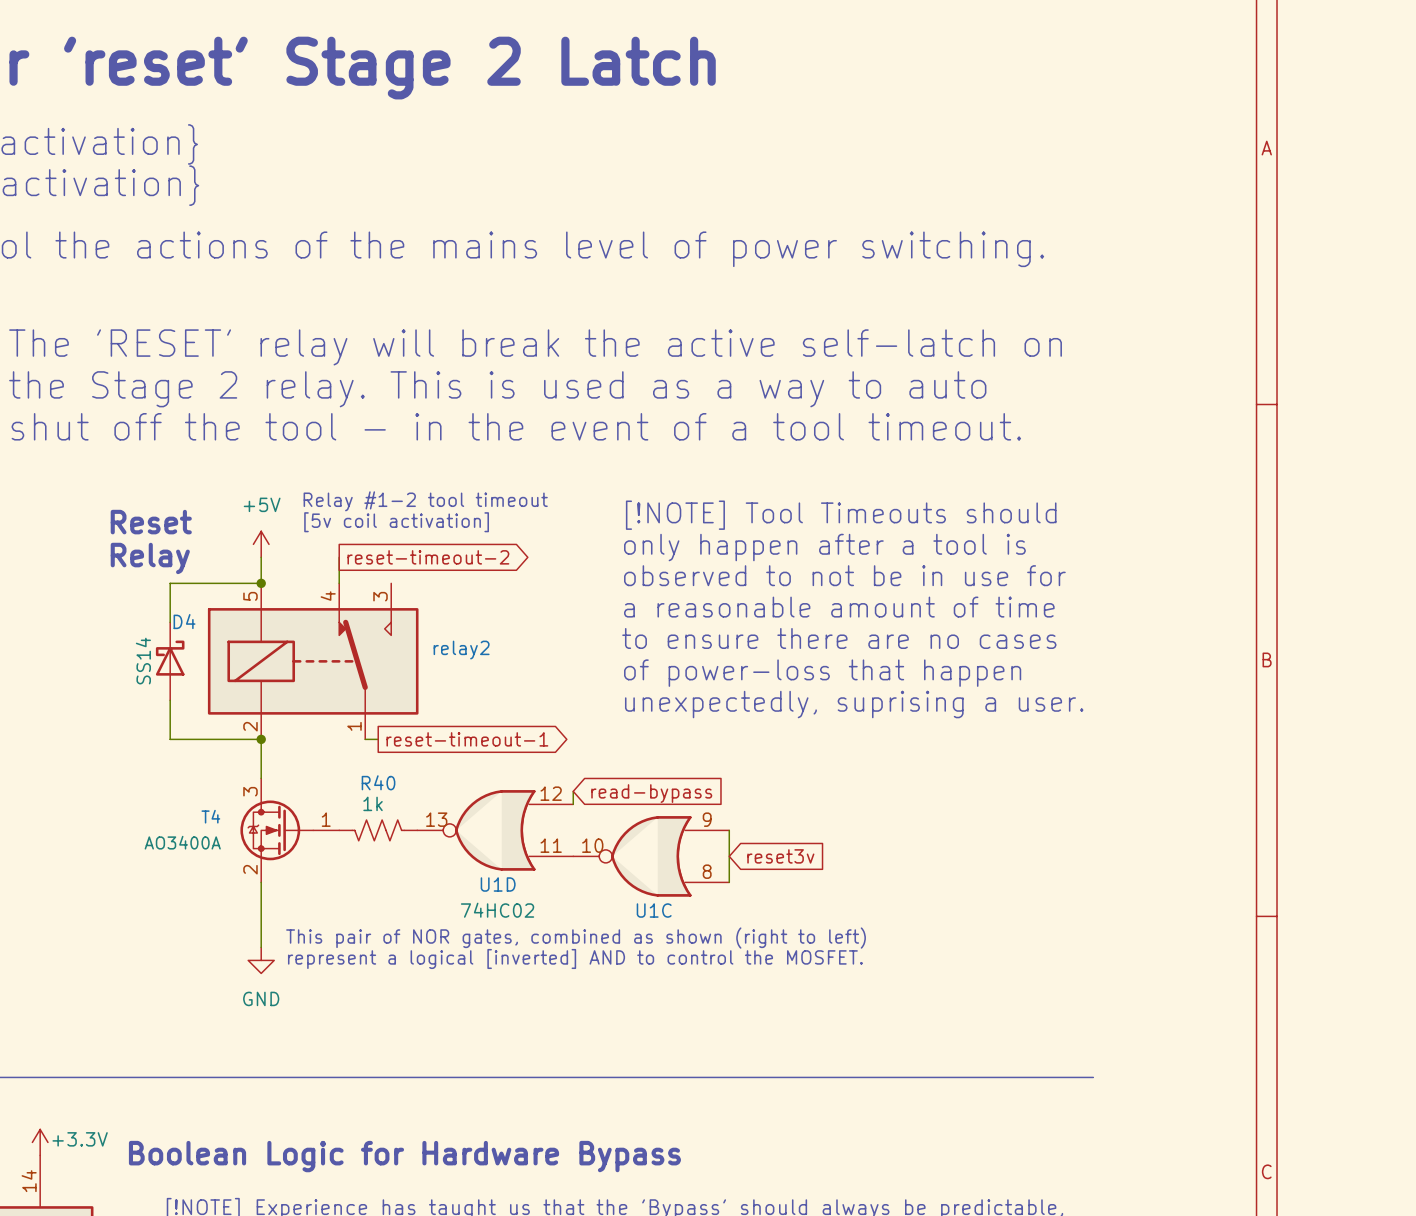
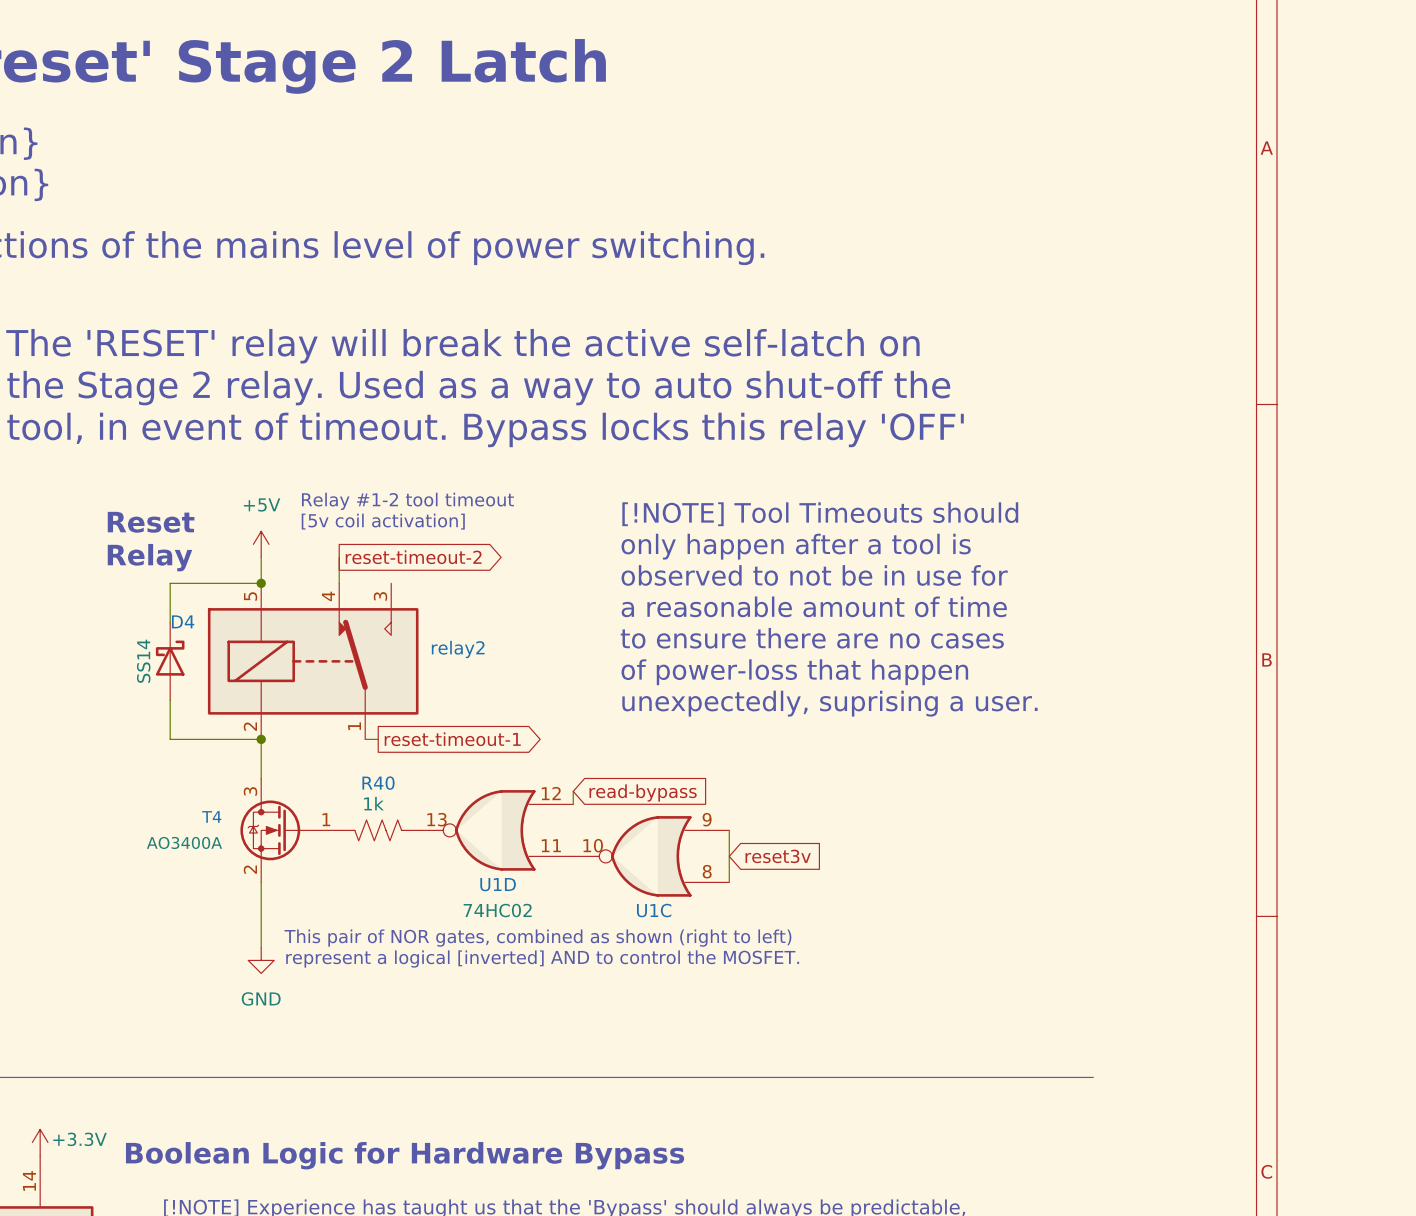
text: the Stage 2 relay. This is used as a way to auto (497, 389) -> the Stage 2 relay. Used as a way to auto shut-off the (478, 388)
text: shut off the tool - in the event of a tool timeout. (516, 426) -> tool, in event of timeout. Bypass locks this relay 'OFF' (485, 429)

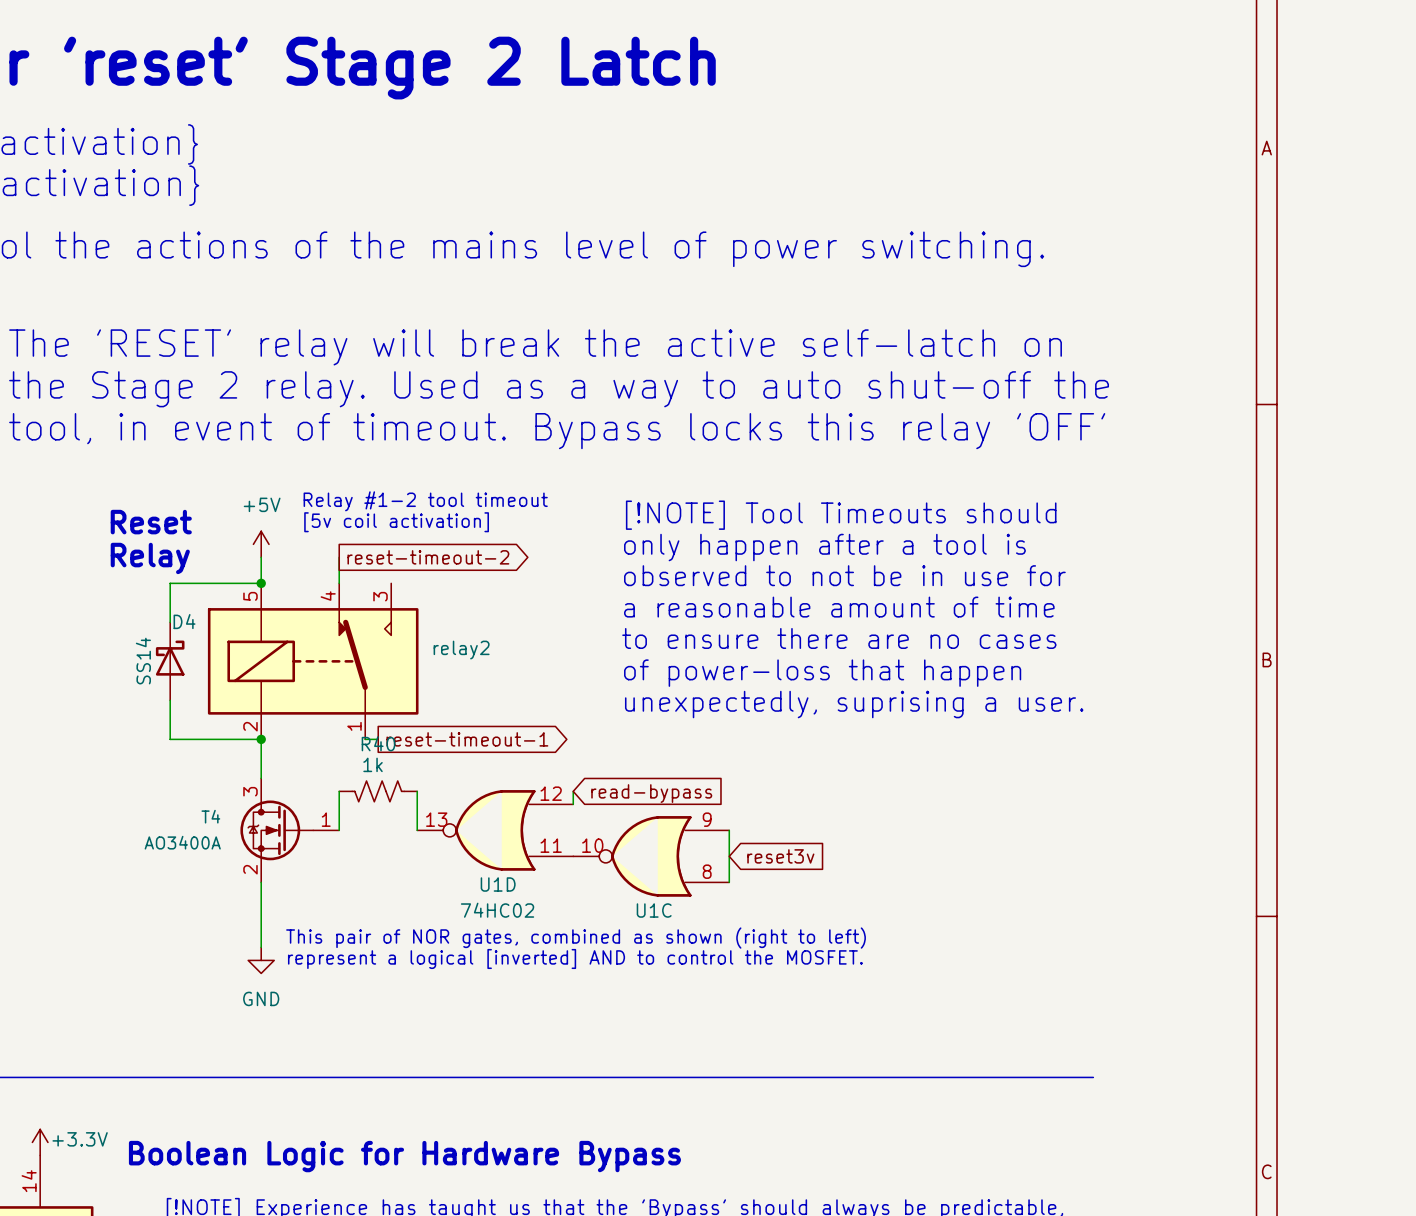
wire: none -> (339, 791) (339, 830)
wire: none -> (417, 791) (417, 830)
R40 position: (378, 830) -> (378, 791)

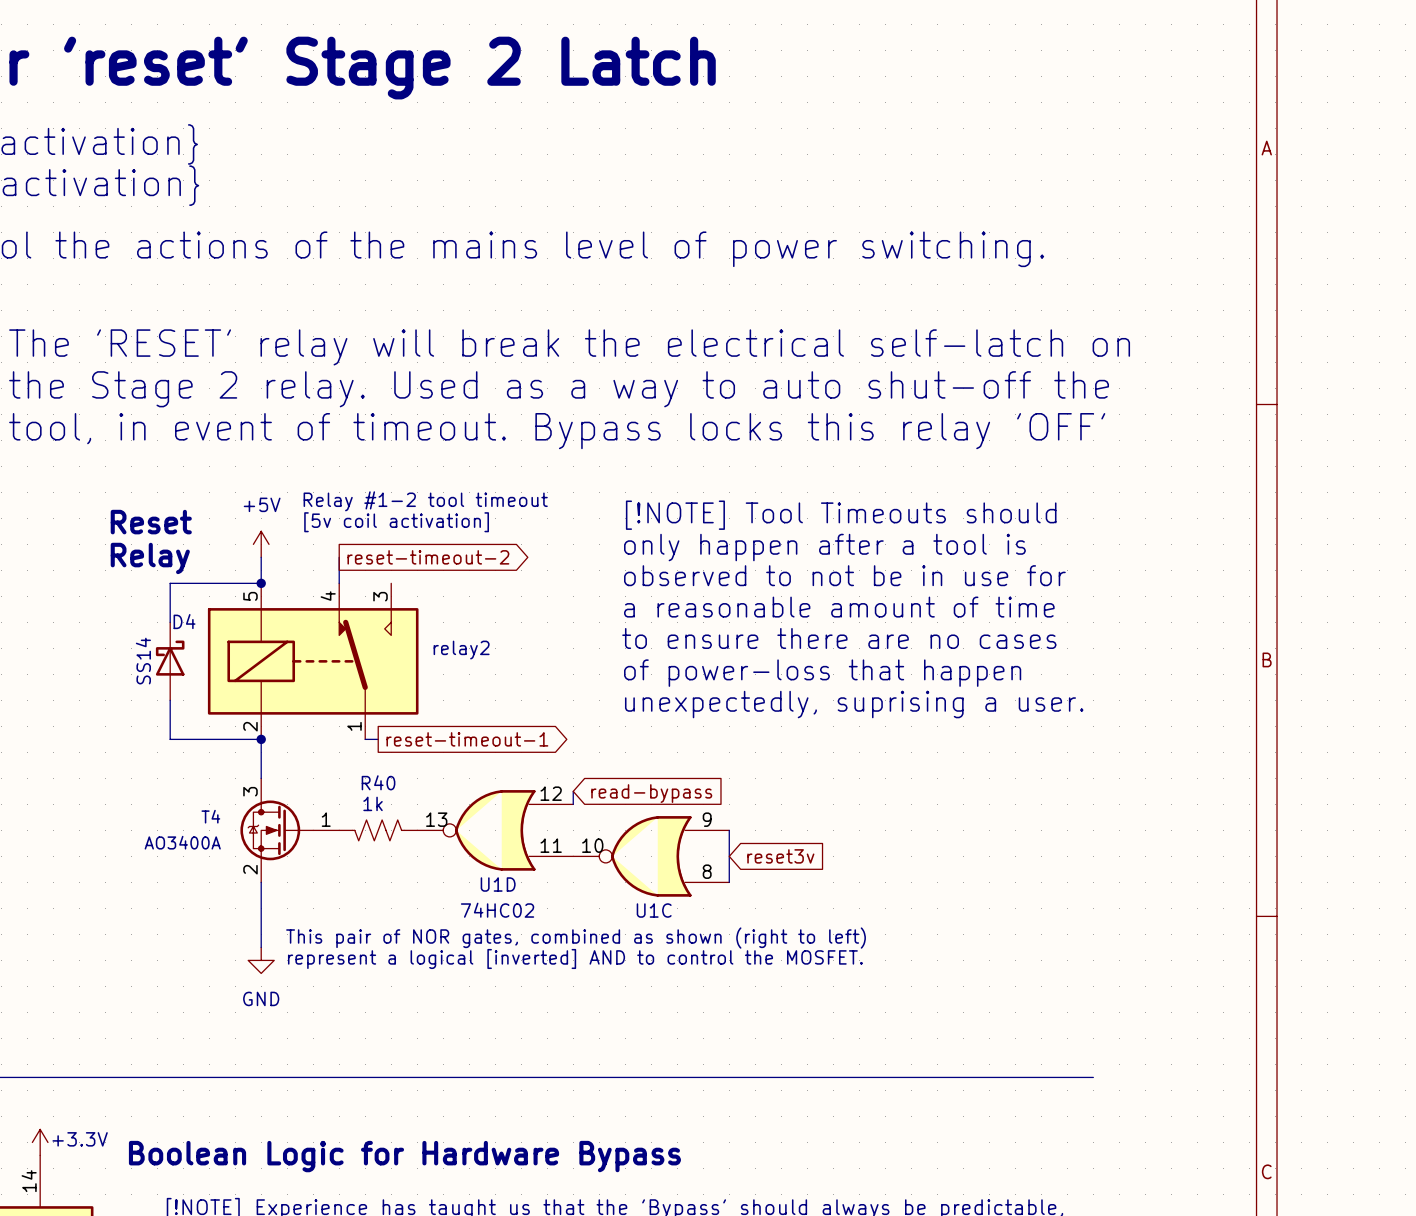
text: The 'RESET' relay will break the active self-latch on (535, 347) -> The 'RESET' relay will break the electrical self-latch on (569, 347)
wire: (339, 791) (339, 830) -> none
R40 position: (378, 791) -> (378, 830)
wire: (417, 791) (417, 830) -> none

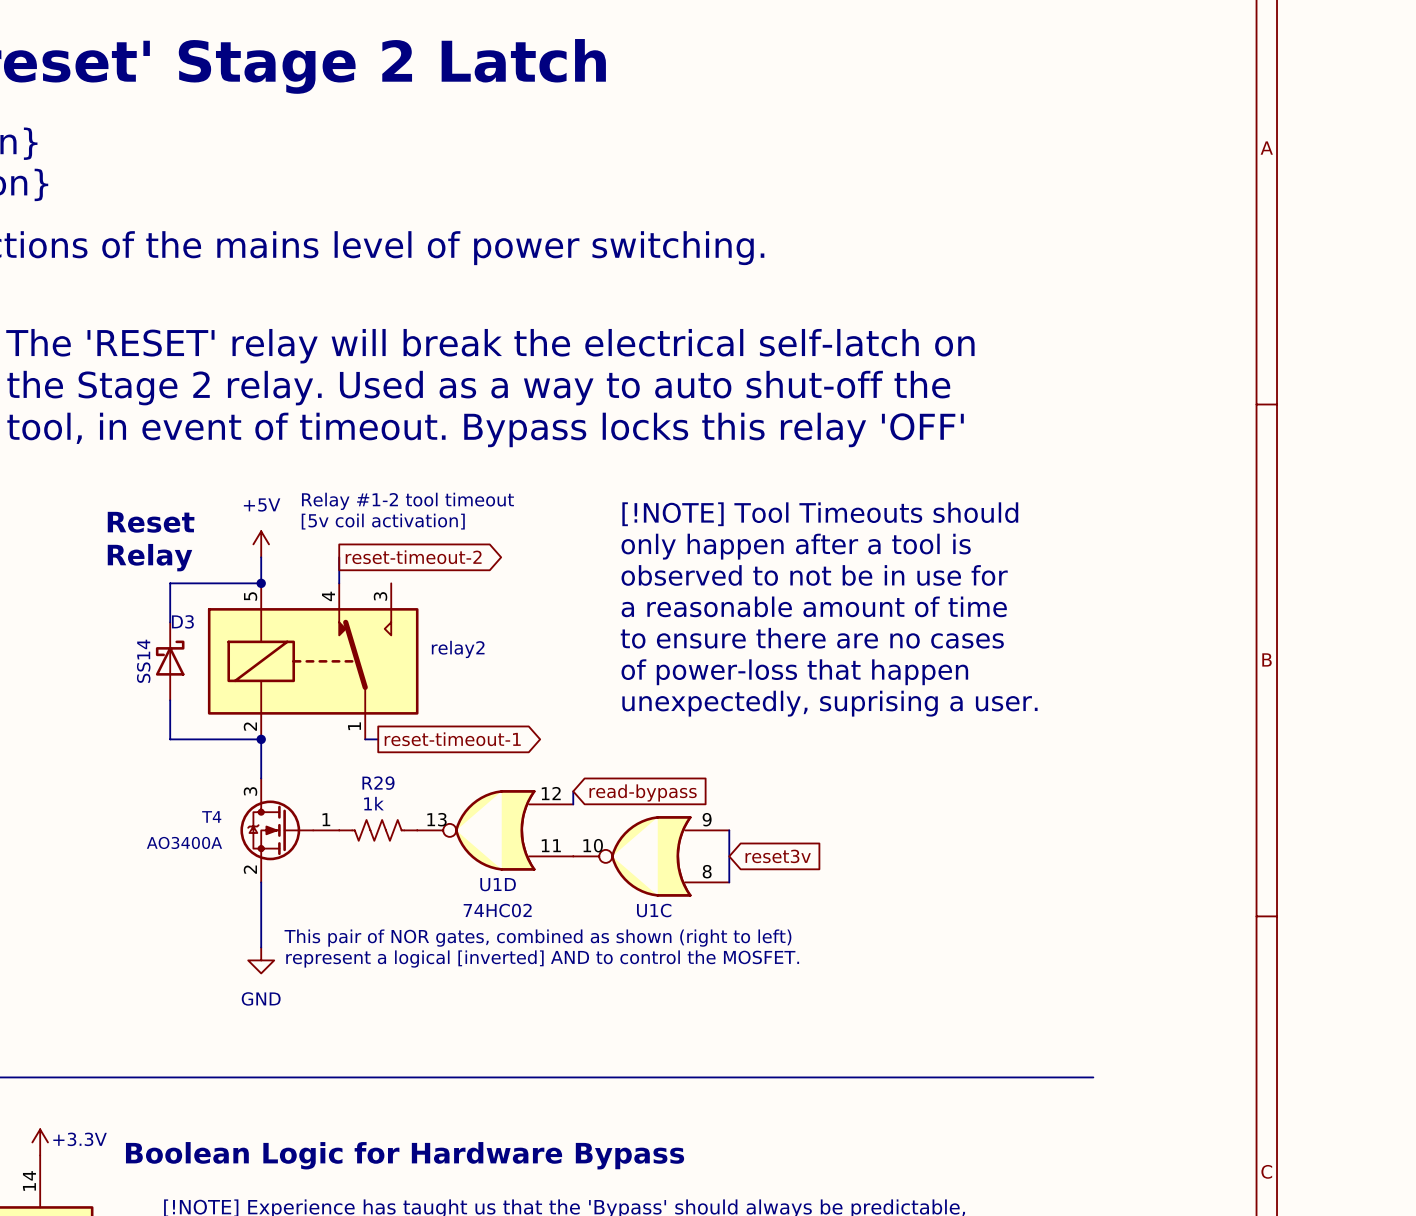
D4 name: D4 (184, 621) -> D3 (182, 621)
R40 name: R40 (378, 782) -> R29 (378, 783)

